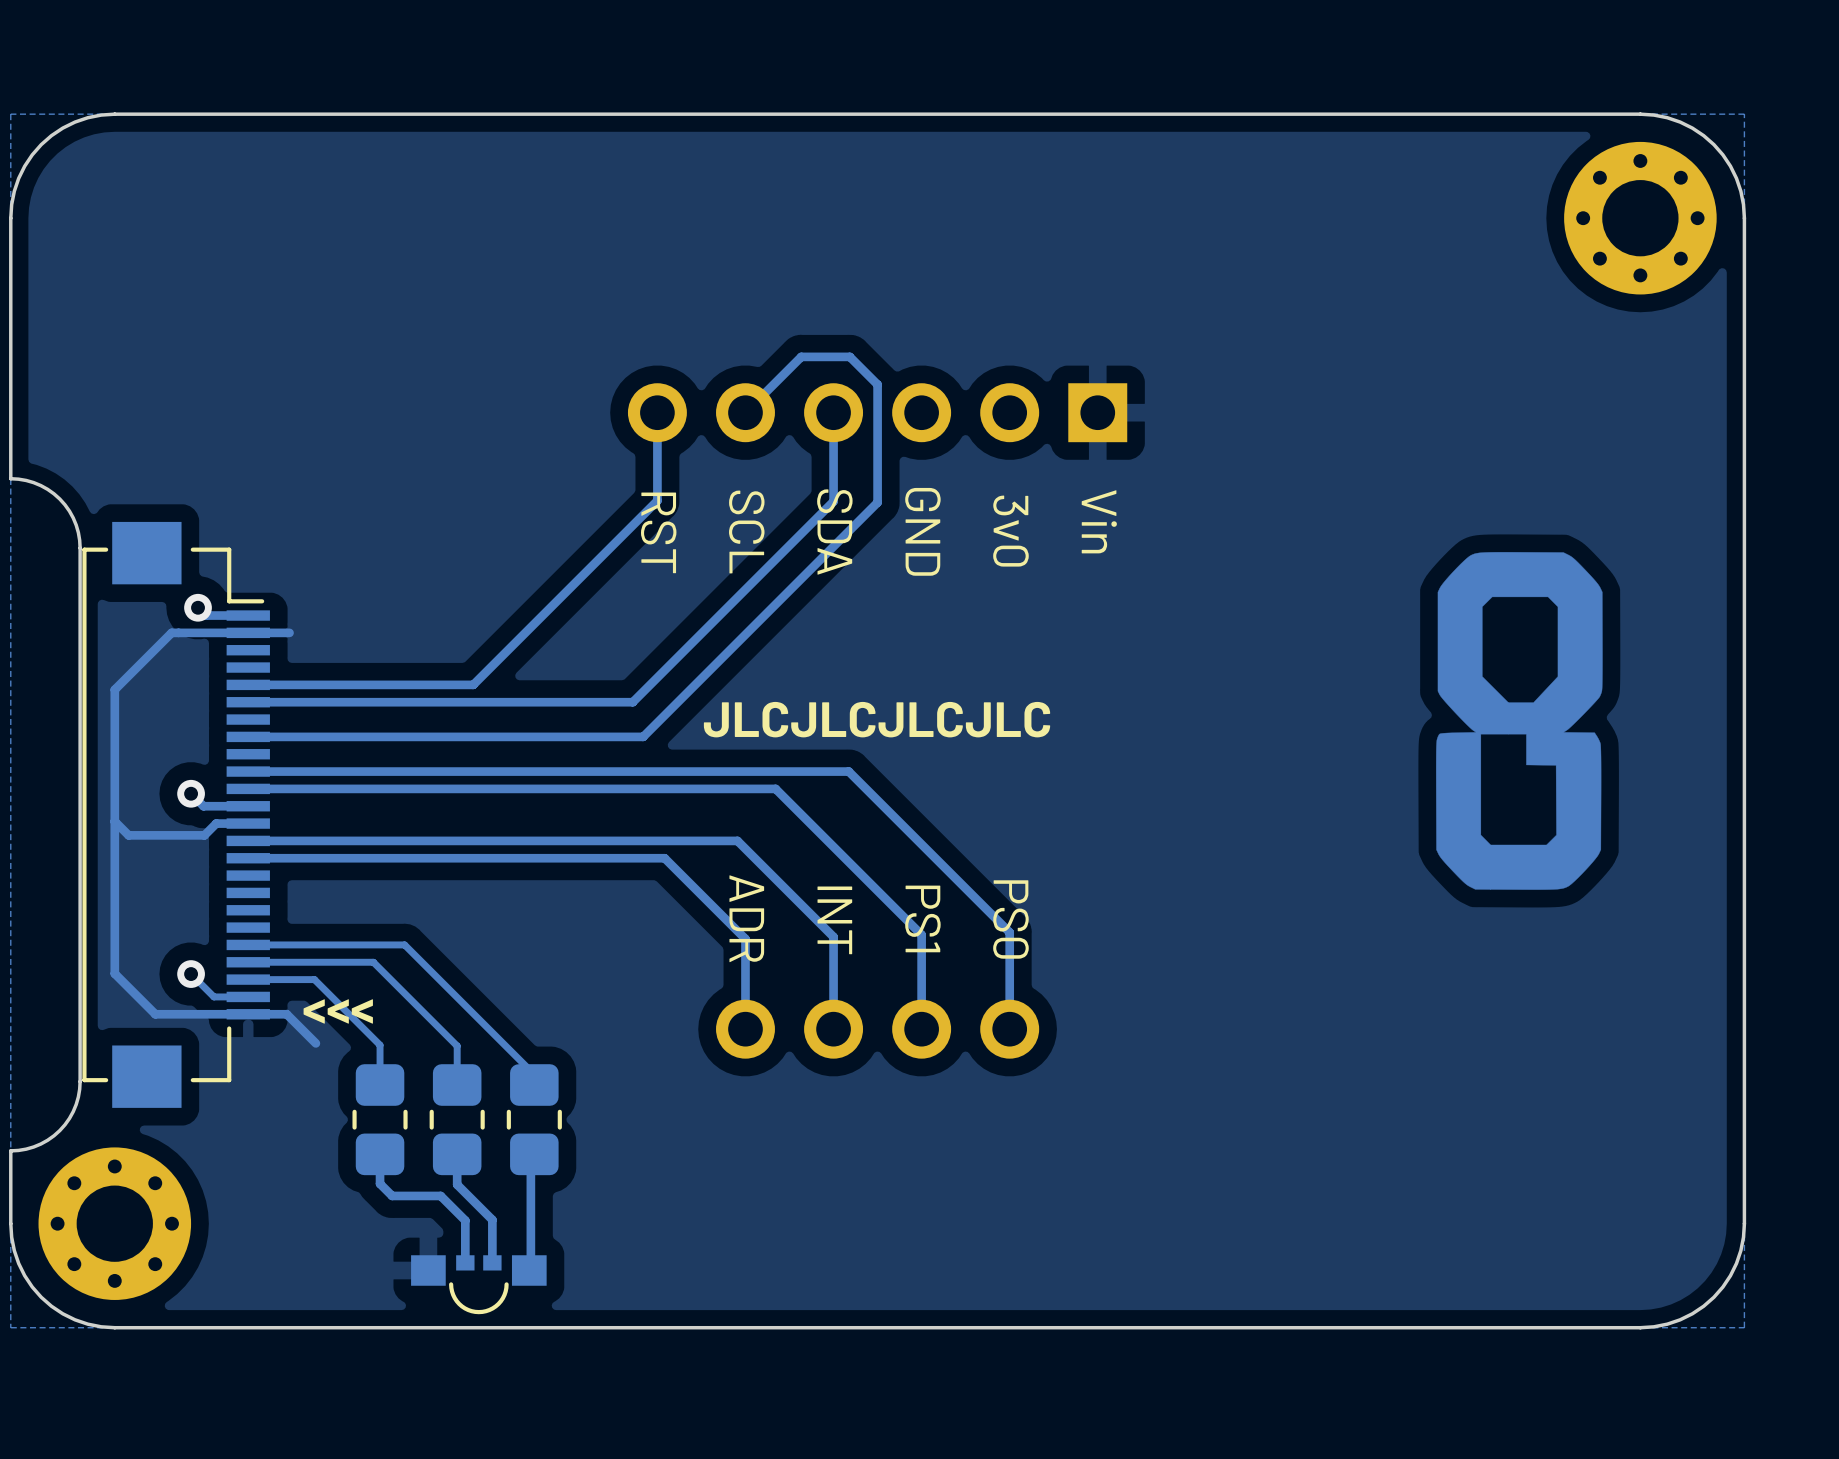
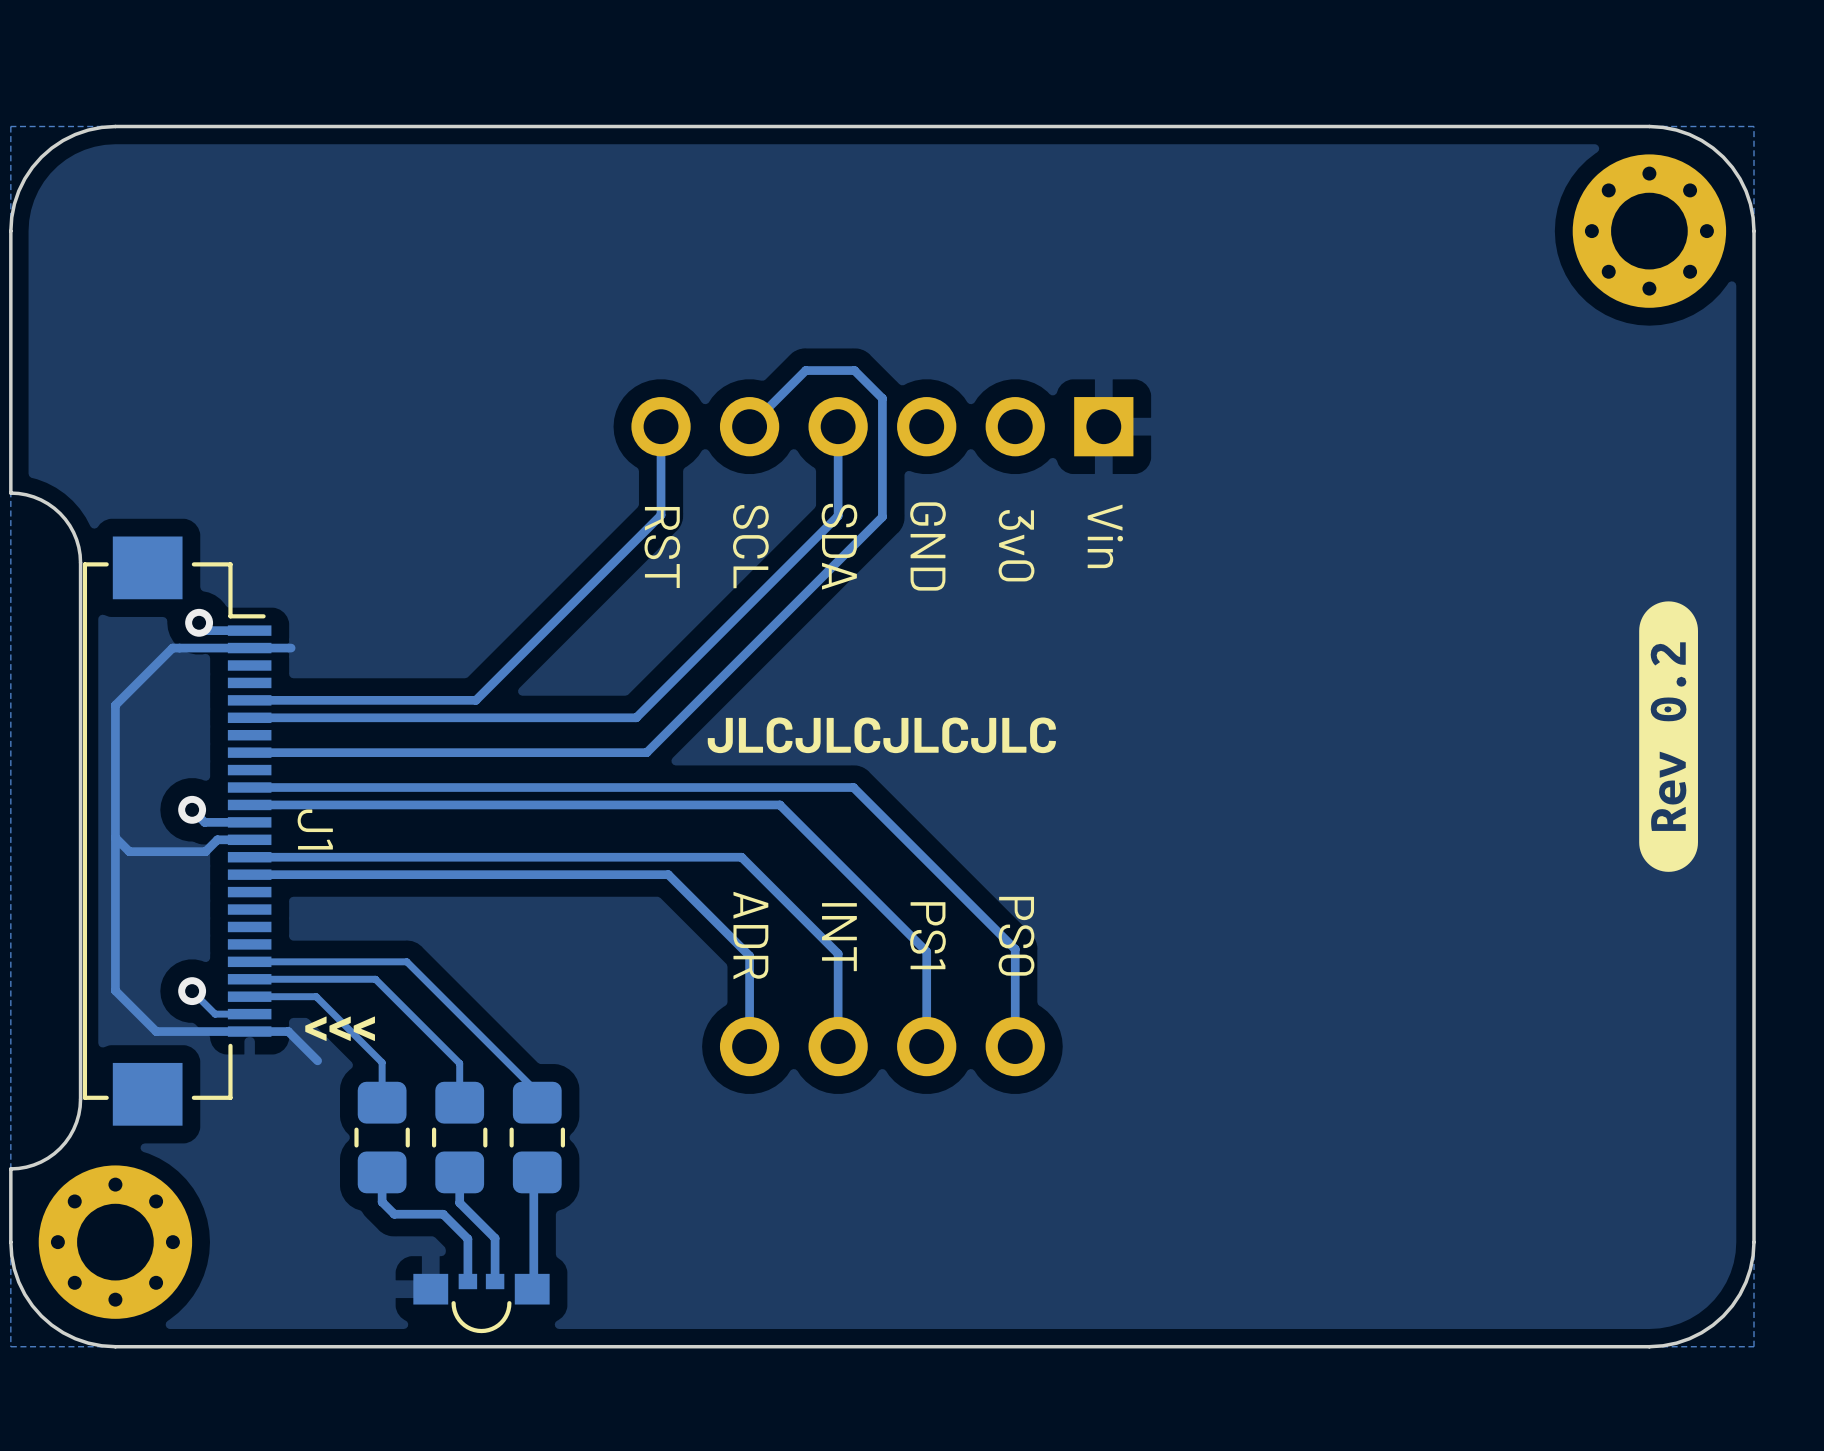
drawing: [1436, 552, 1603, 890] -> none
drawing: none -> [1639, 601, 1698, 872]
J1 name: none -> J1 (315, 829)

